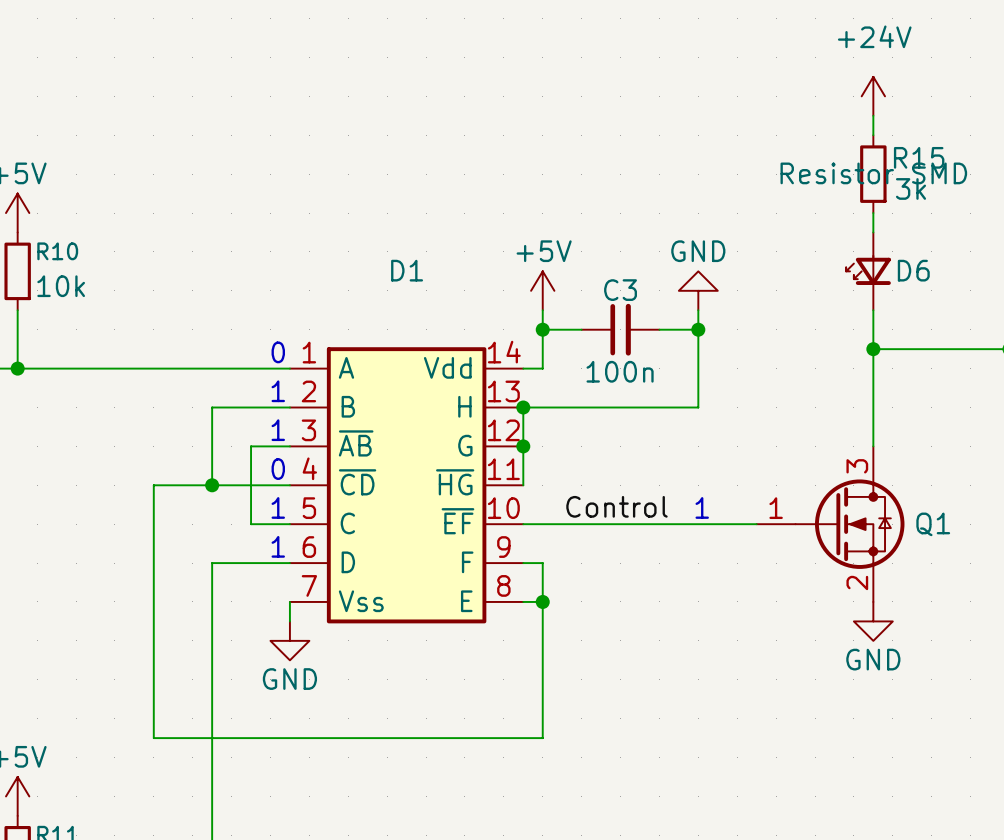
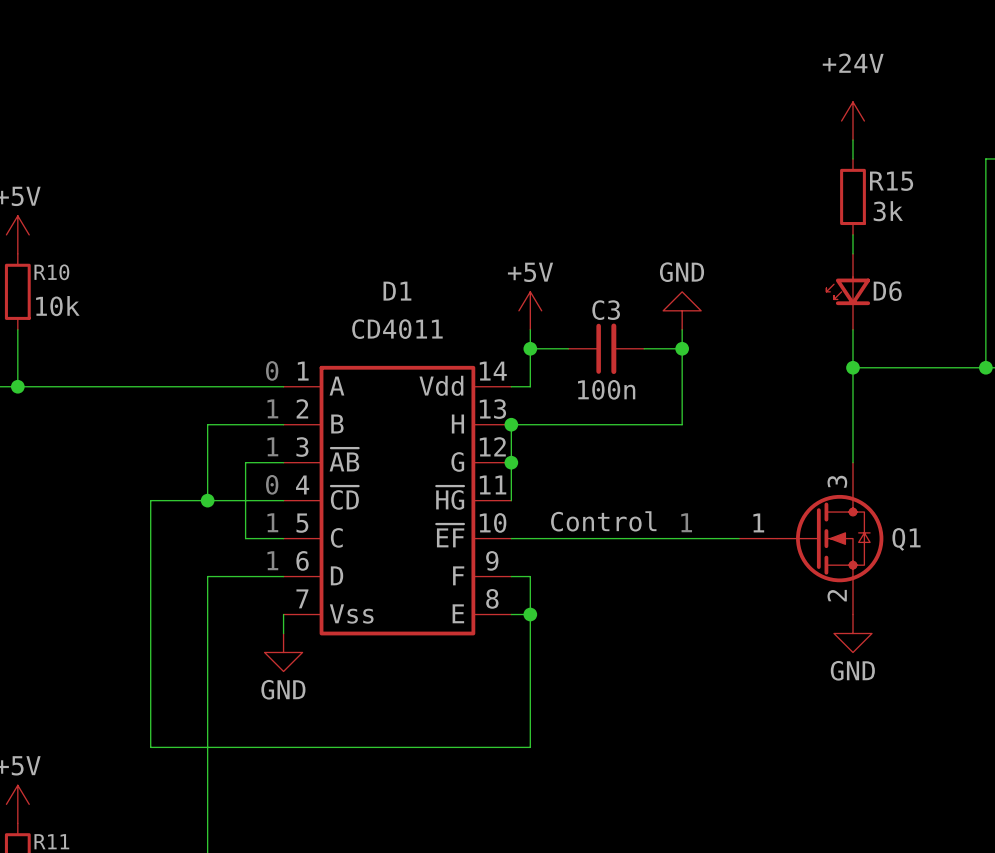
R15 text: Resistor SMD (873, 173) -> none
D1 value: none -> CD4011 (397, 329)

